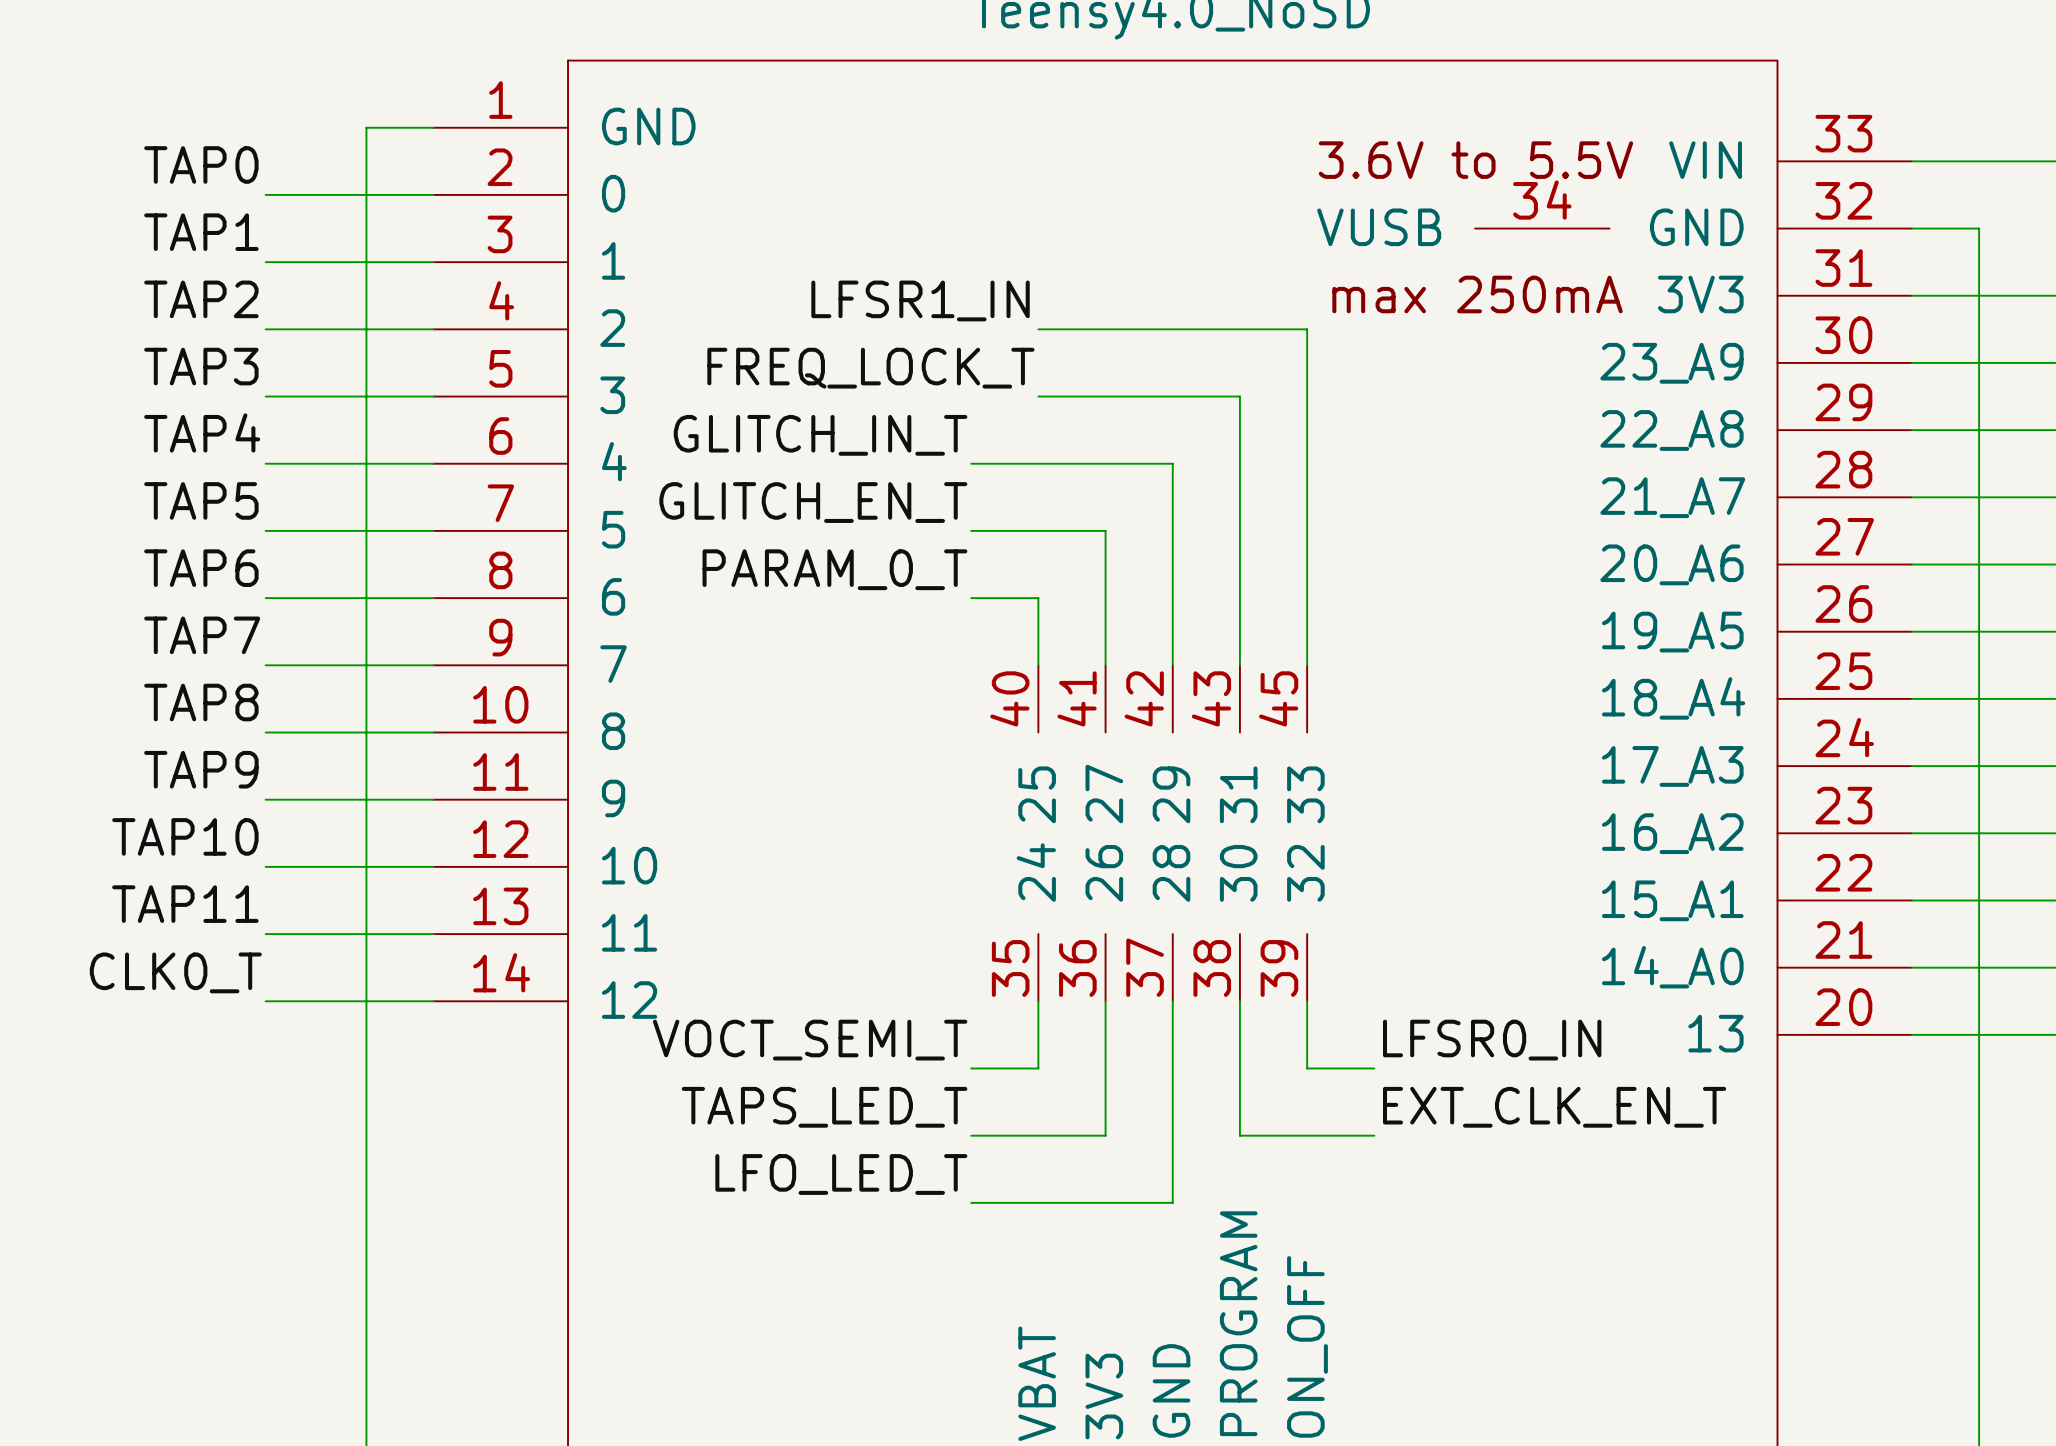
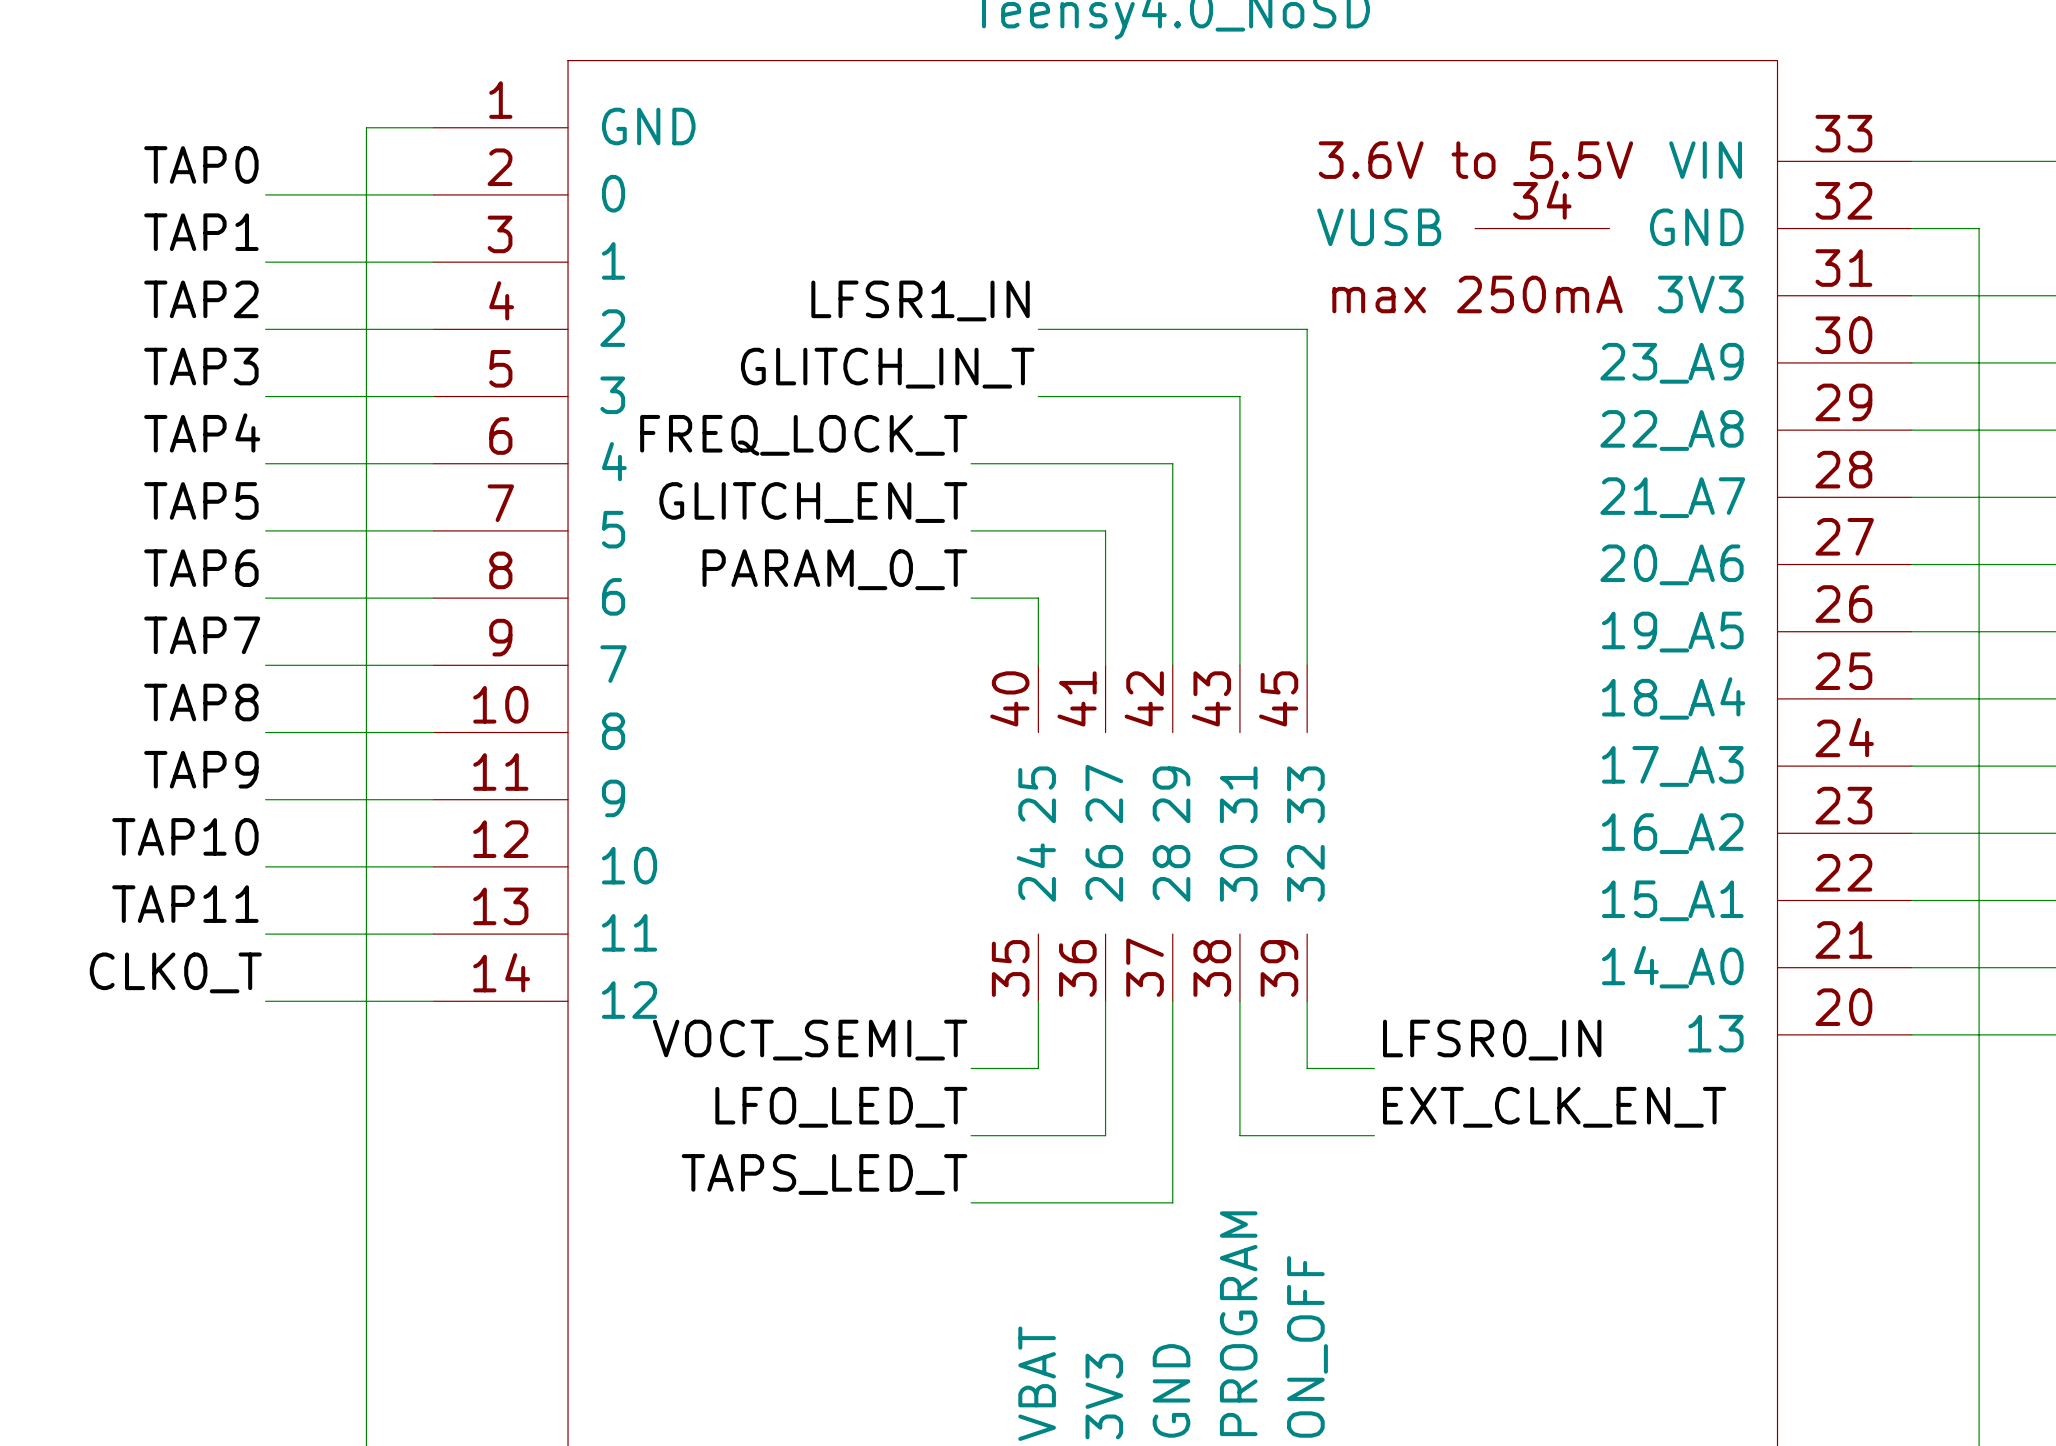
label: FREQ_LOCK_T (870, 368) -> GLITCH_IN_T (887, 368)
label: GLITCH_IN_T (820, 435) -> FREQ_LOCK_T (803, 435)
label: TAPS_LED_T (824, 1107) -> LFO_LED_T (841, 1107)
label: LFO_LED_T (841, 1174) -> TAPS_LED_T (824, 1174)

